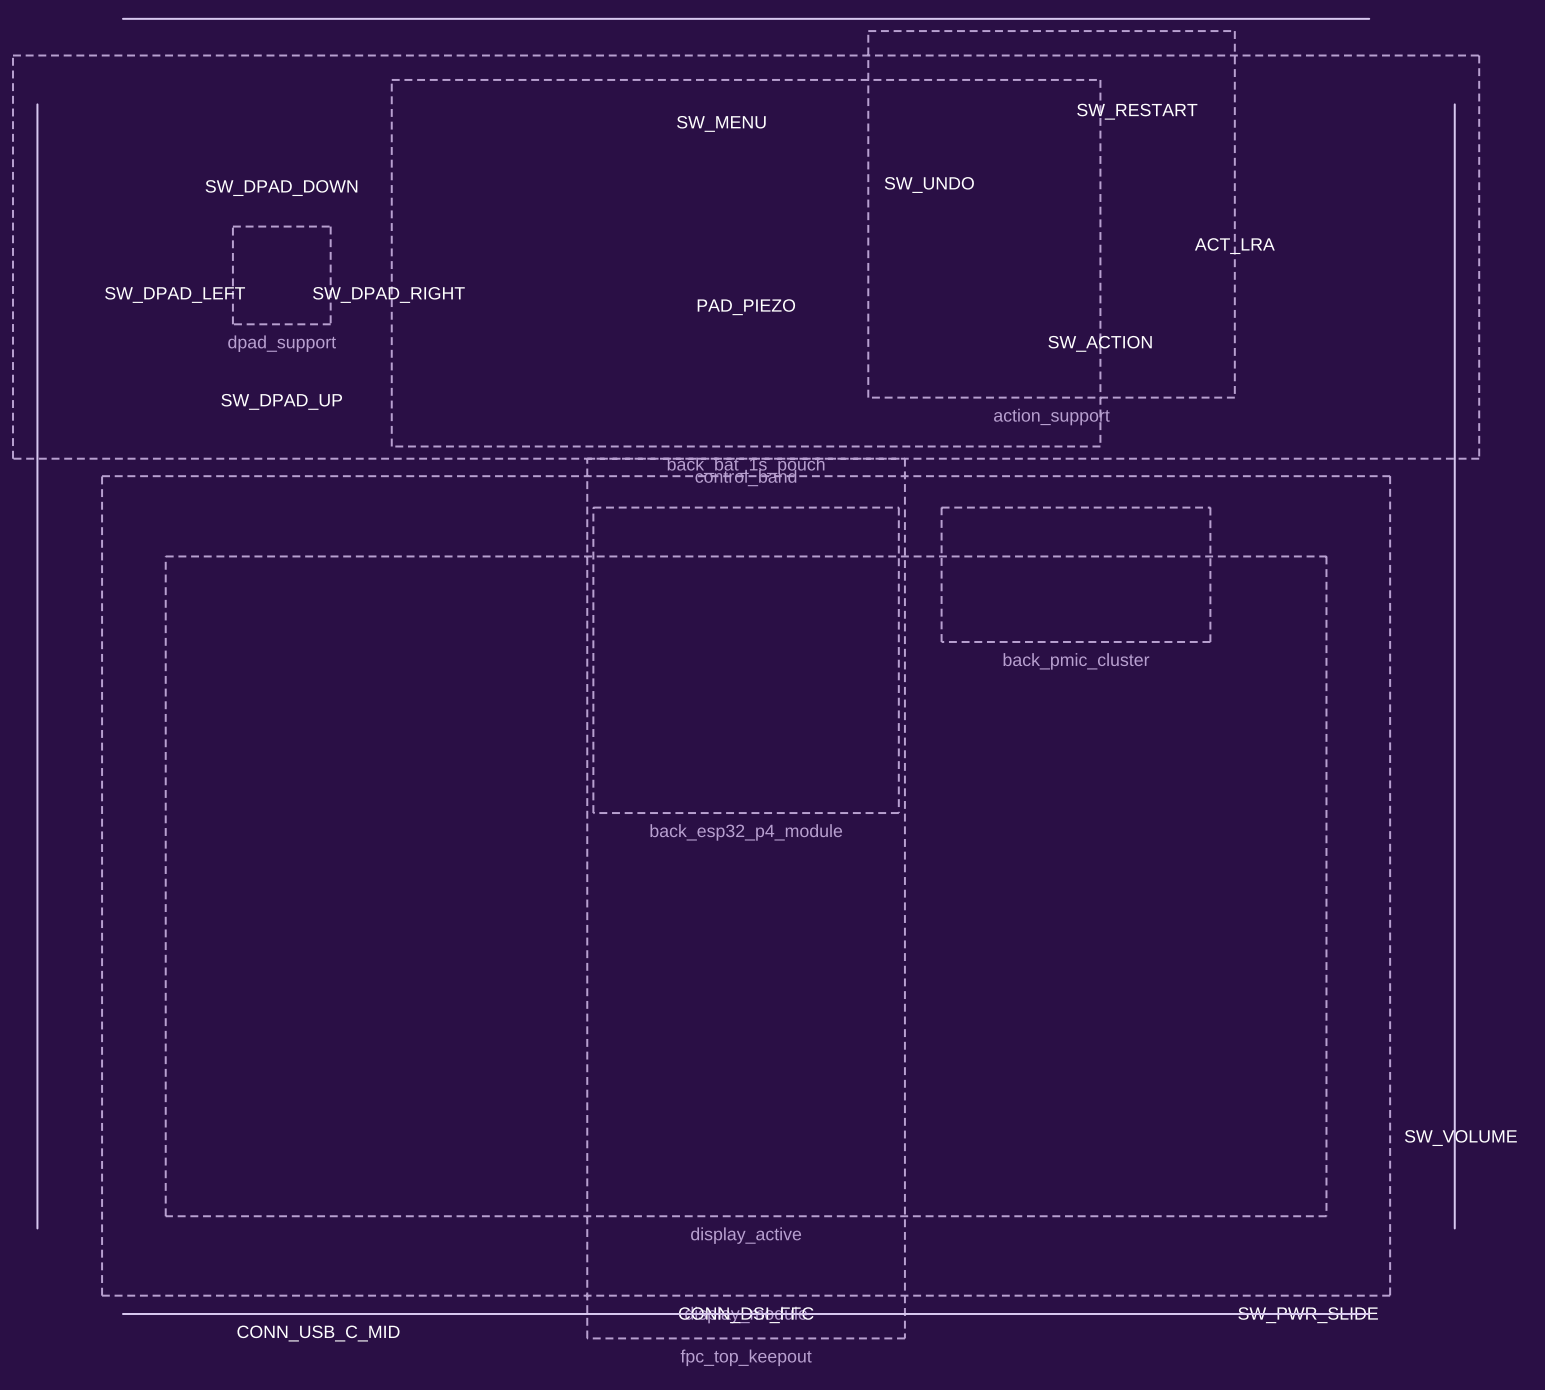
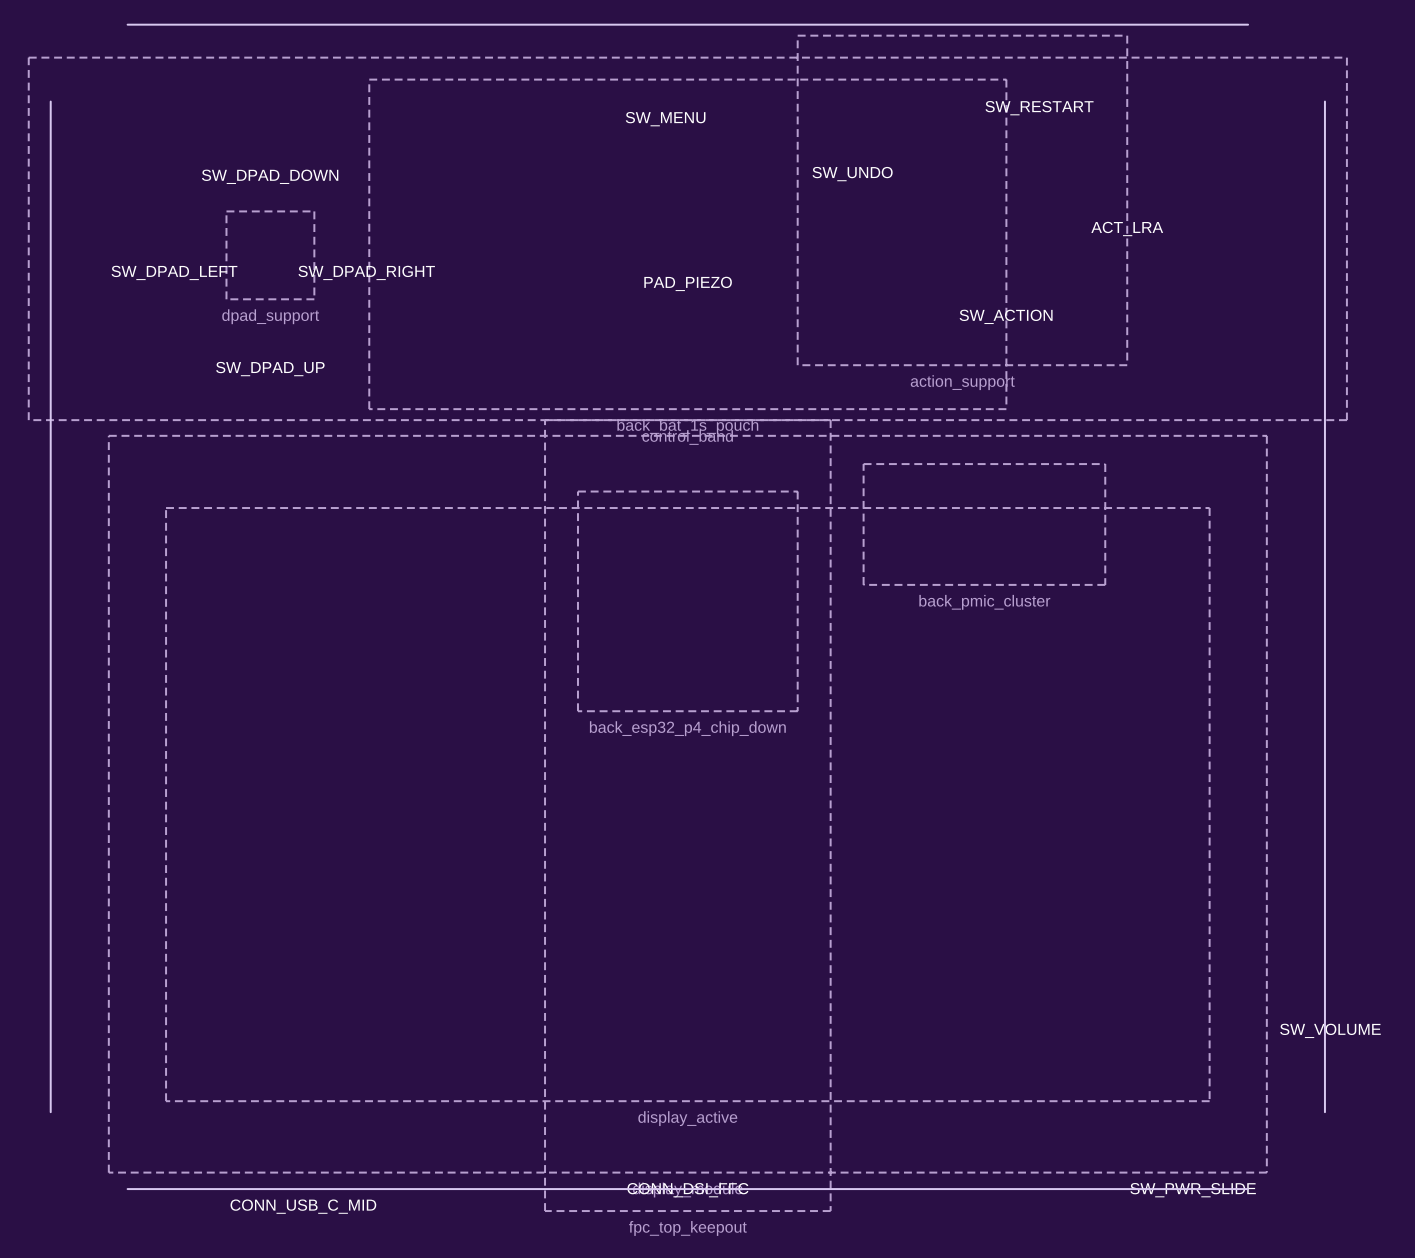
line: (593, 507) (898, 507) (898, 813) (593, 813) (593, 507) -> (577, 491) (577, 711) (797, 711) (797, 491) (577, 491)
text: none -> back_esp32_p4_chip_down (687, 728)
text: back_esp32_p4_module (746, 832) -> none

